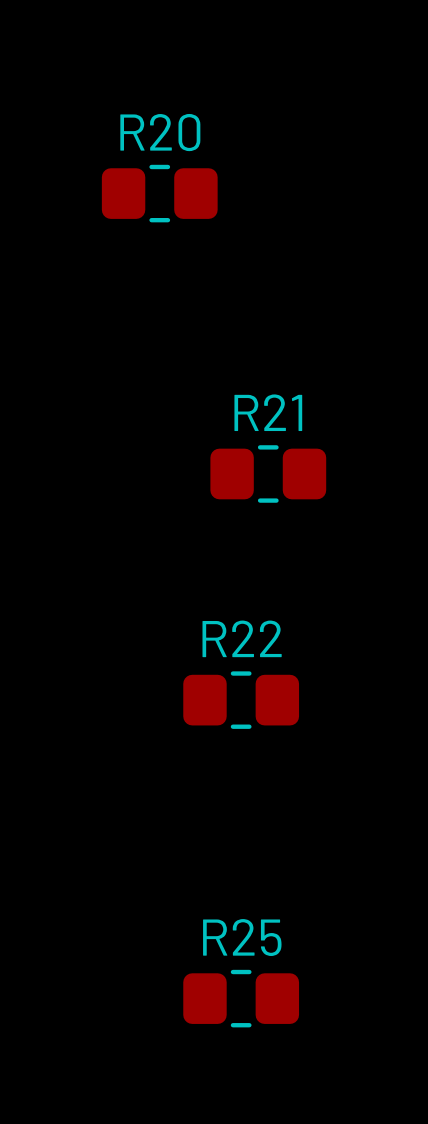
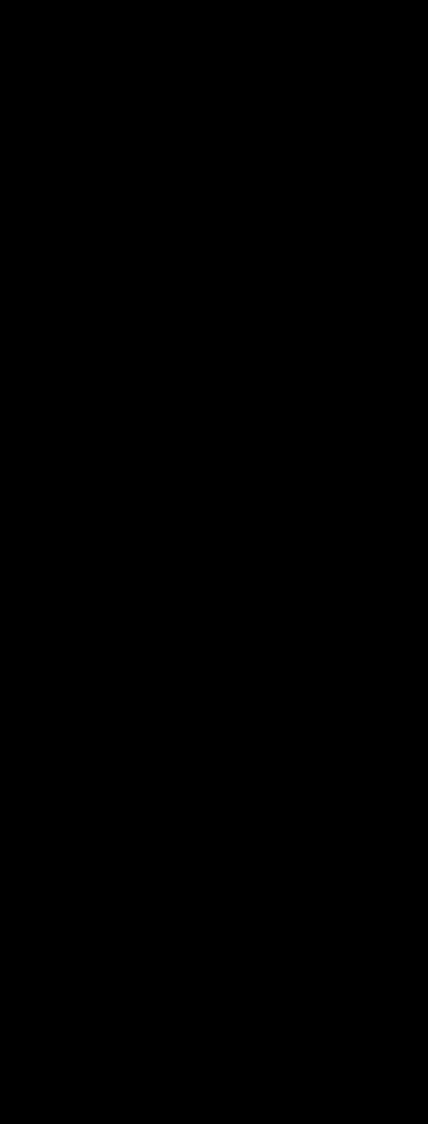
R20: (159, 193) -> none
R21: (268, 473) -> none
R22: (241, 700) -> none
R25: (241, 998) -> none

